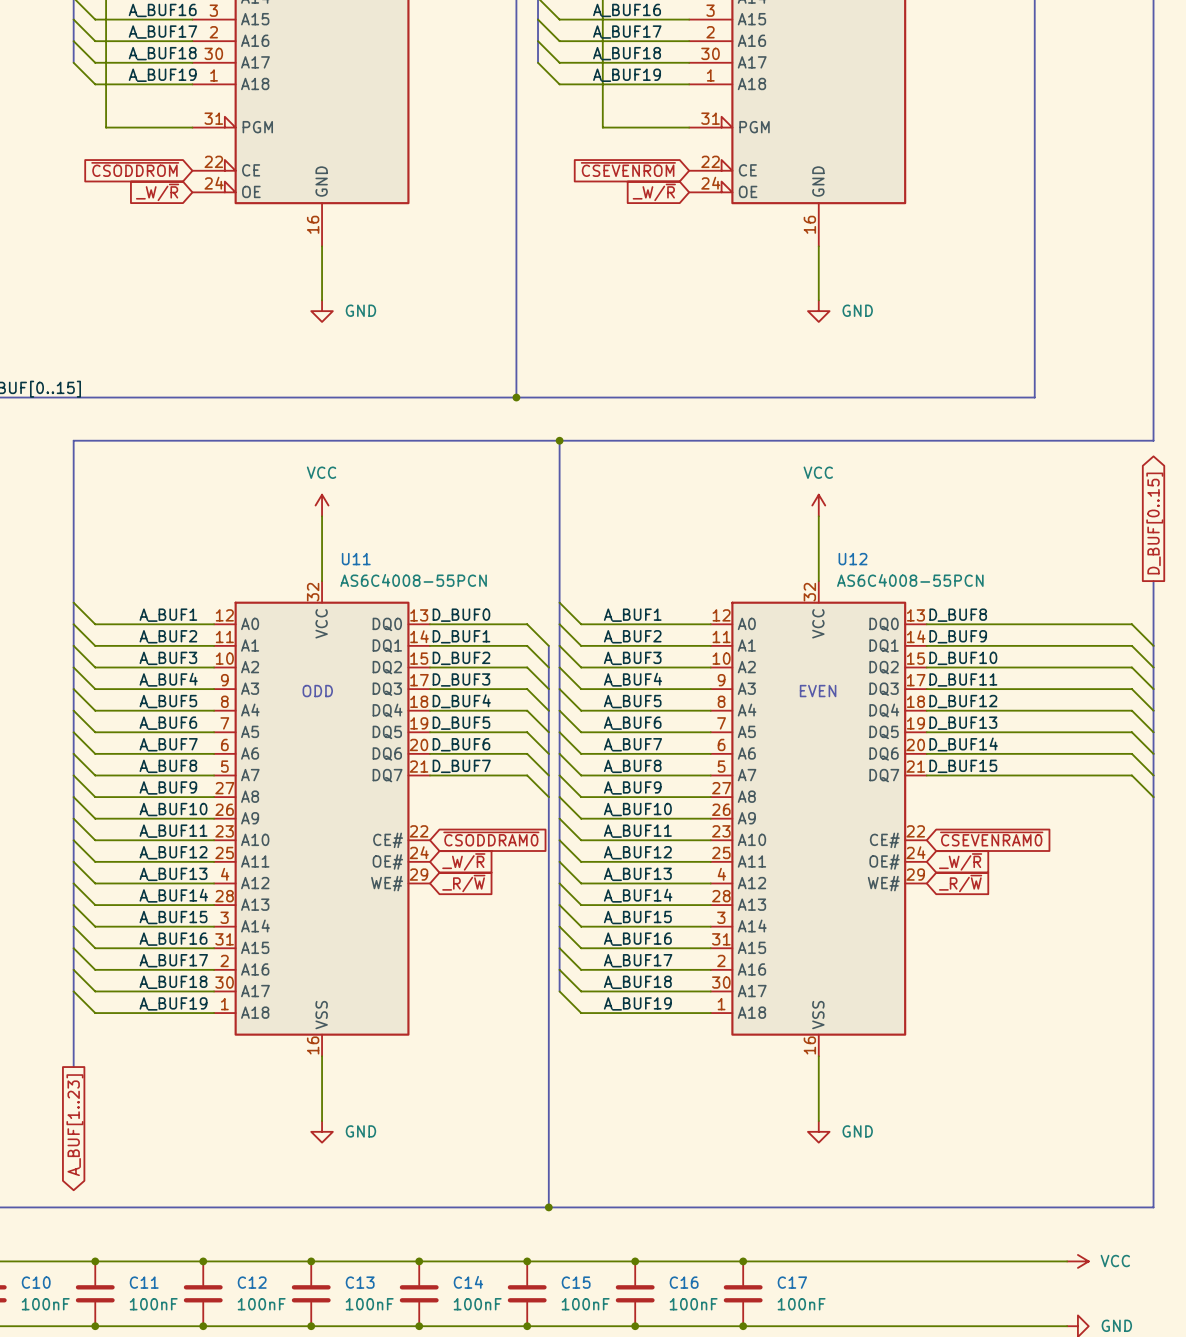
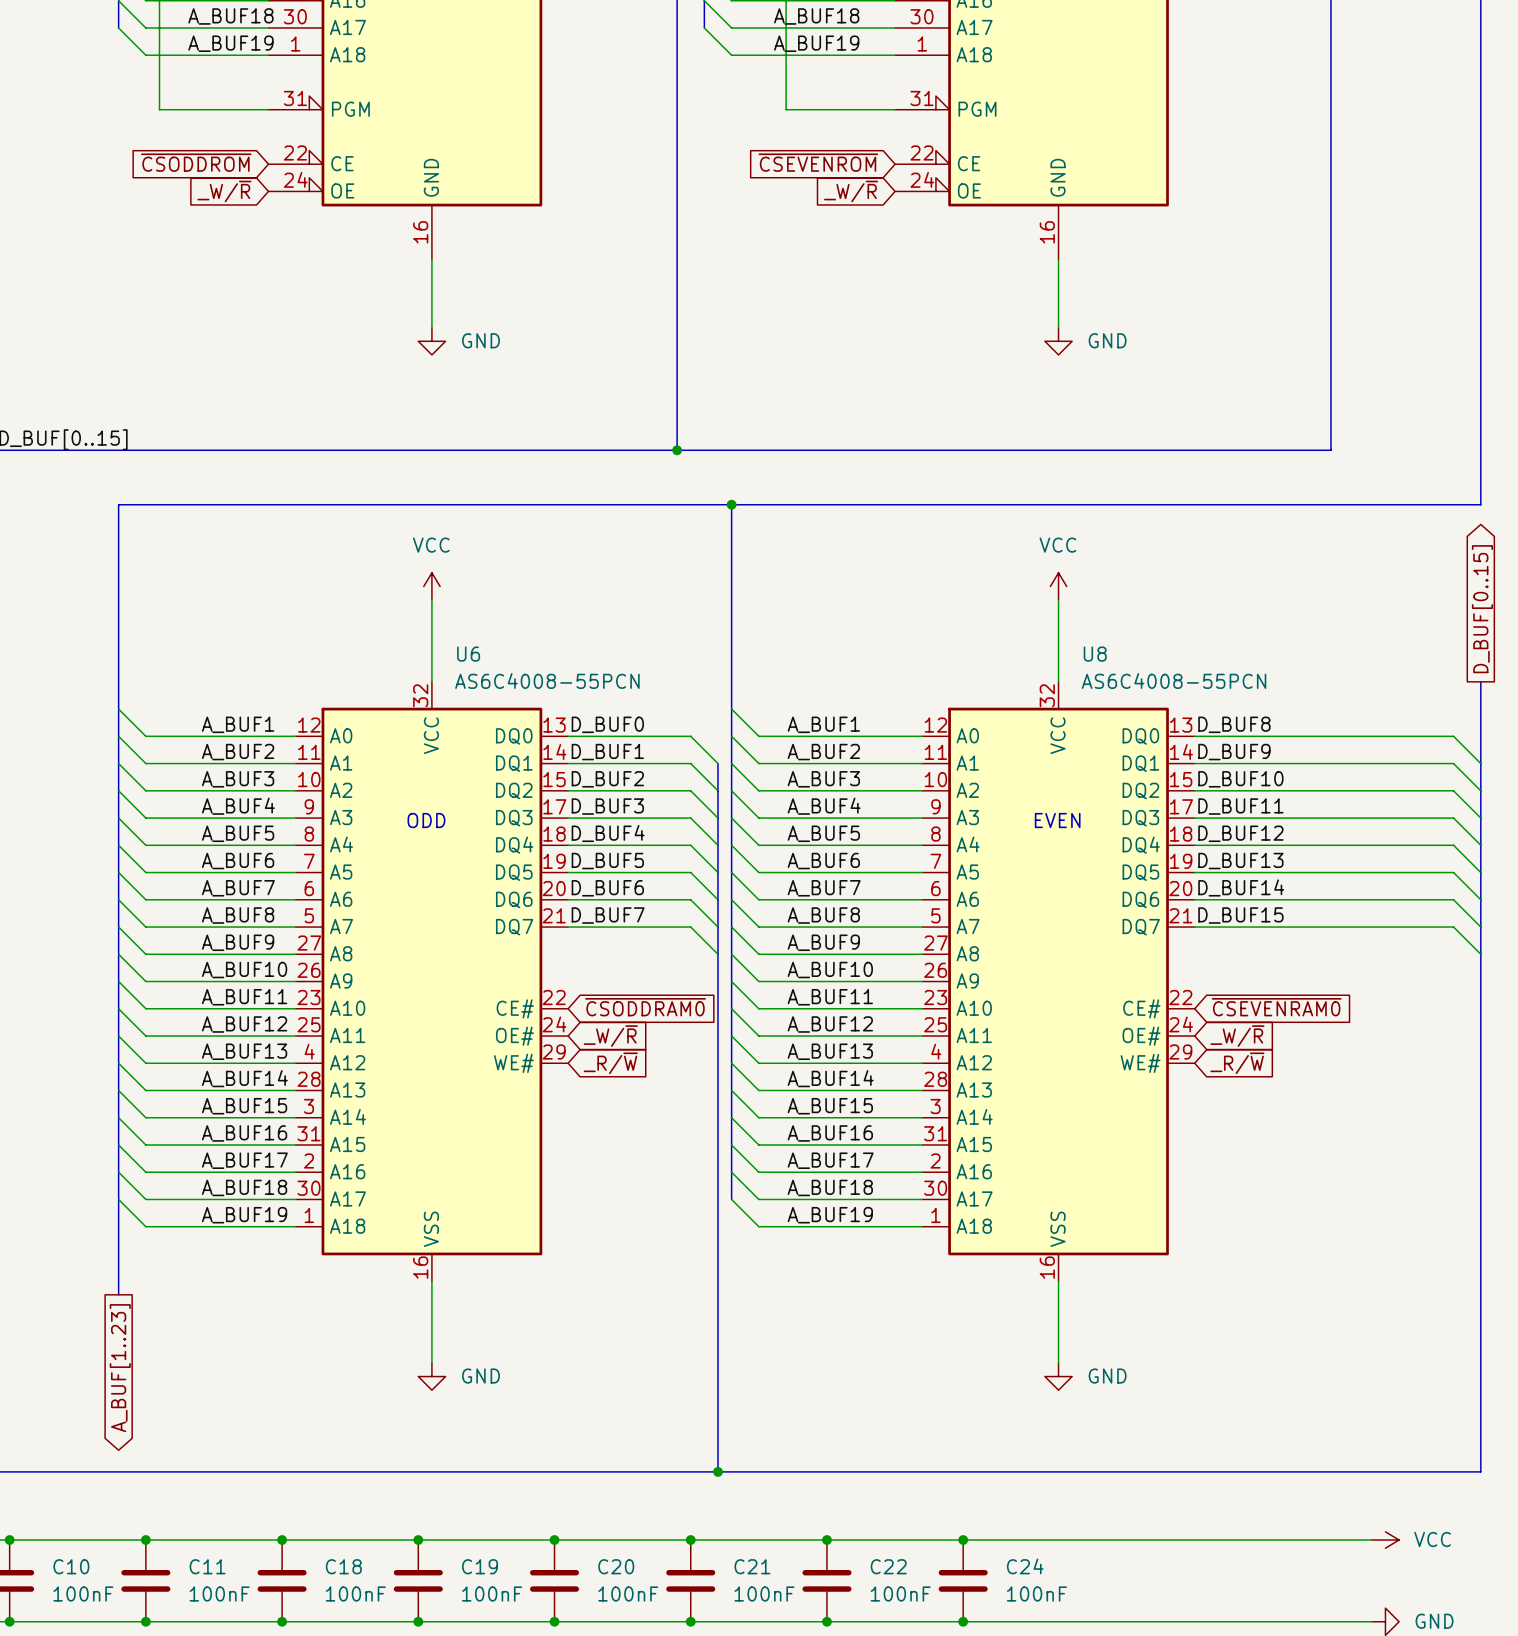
U11 name: U11 (356, 559) -> U6 (468, 654)
U12 name: U12 (852, 559) -> U8 (1095, 654)
C12 name: C12 (252, 1282) -> C18 (343, 1566)
C13 name: C13 (360, 1282) -> C19 (480, 1566)
C14 name: C14 (468, 1282) -> C20 (616, 1566)
C15 name: C15 (576, 1282) -> C21 (752, 1566)
C16 name: C16 (684, 1282) -> C22 (888, 1566)
C17 name: C17 (792, 1282) -> C24 (1025, 1566)

